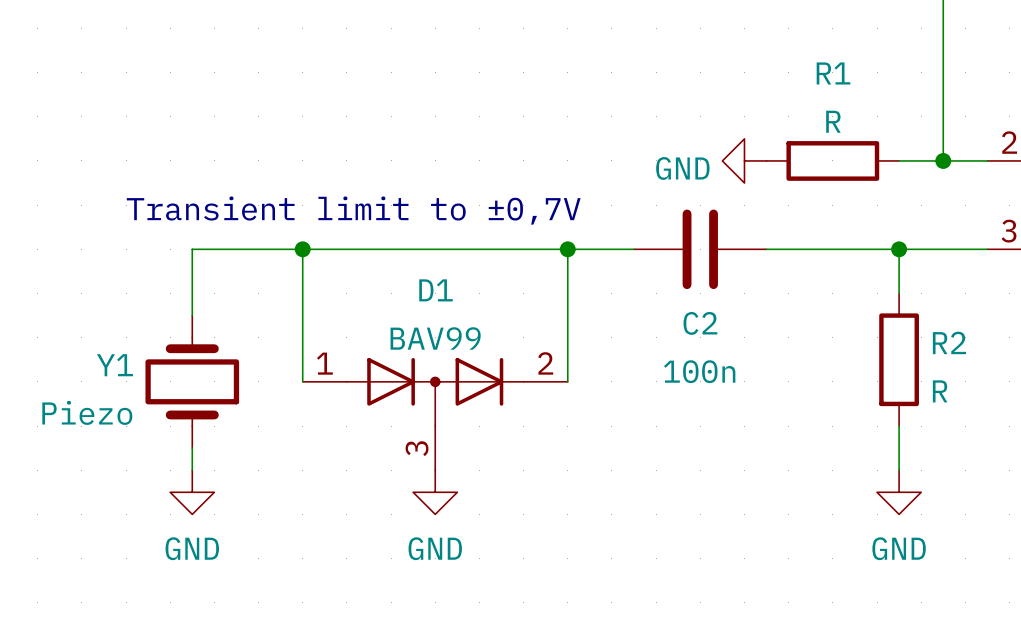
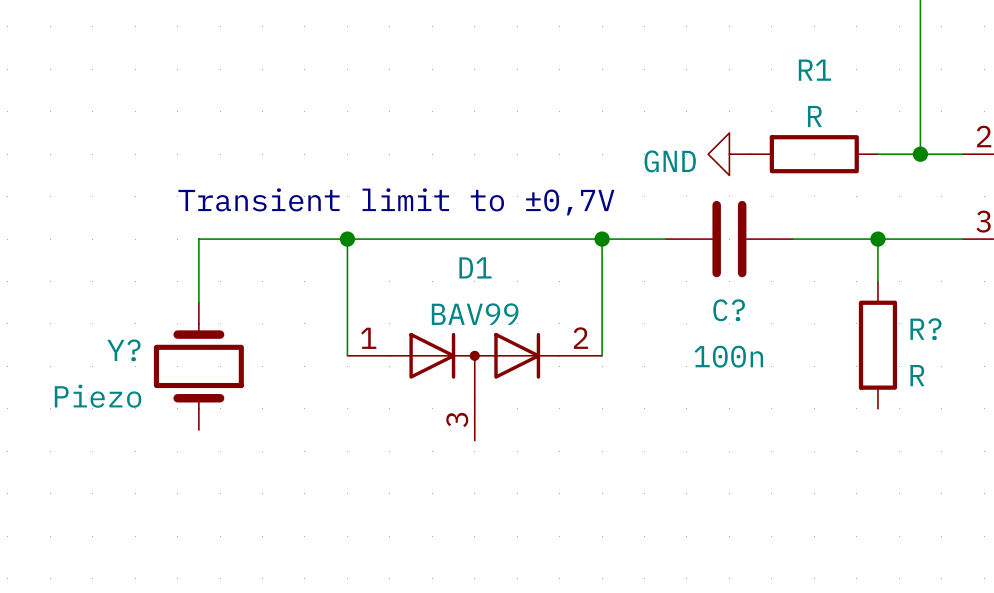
text position: Transient limit to ±0,7V (353, 210) -> Transient limit to ±0,7V (396, 201)
wire: (302, 249) (302, 381) -> none
junction position: (302, 249) -> (347, 239)
wire: none -> (347, 239) (347, 355)
wire: (567, 249) (567, 381) -> none
junction position: (567, 249) -> (602, 239)
wire: none -> (602, 239) (602, 355)
C2: 100n (700, 249) -> none
C?: none -> 100n (729, 239)
R2 name: R2 (949, 342) -> R? (925, 329)
Y1 name: Y1 (114, 365) -> Y? (123, 350)
D1 position: (435, 414) -> (474, 386)
wire: (899, 426) (899, 470) -> none
wire: (192, 448) (192, 470) -> none
power symbol: GND (192, 492) -> none
power symbol: GND (435, 492) -> none
power symbol: GND (899, 492) -> none

